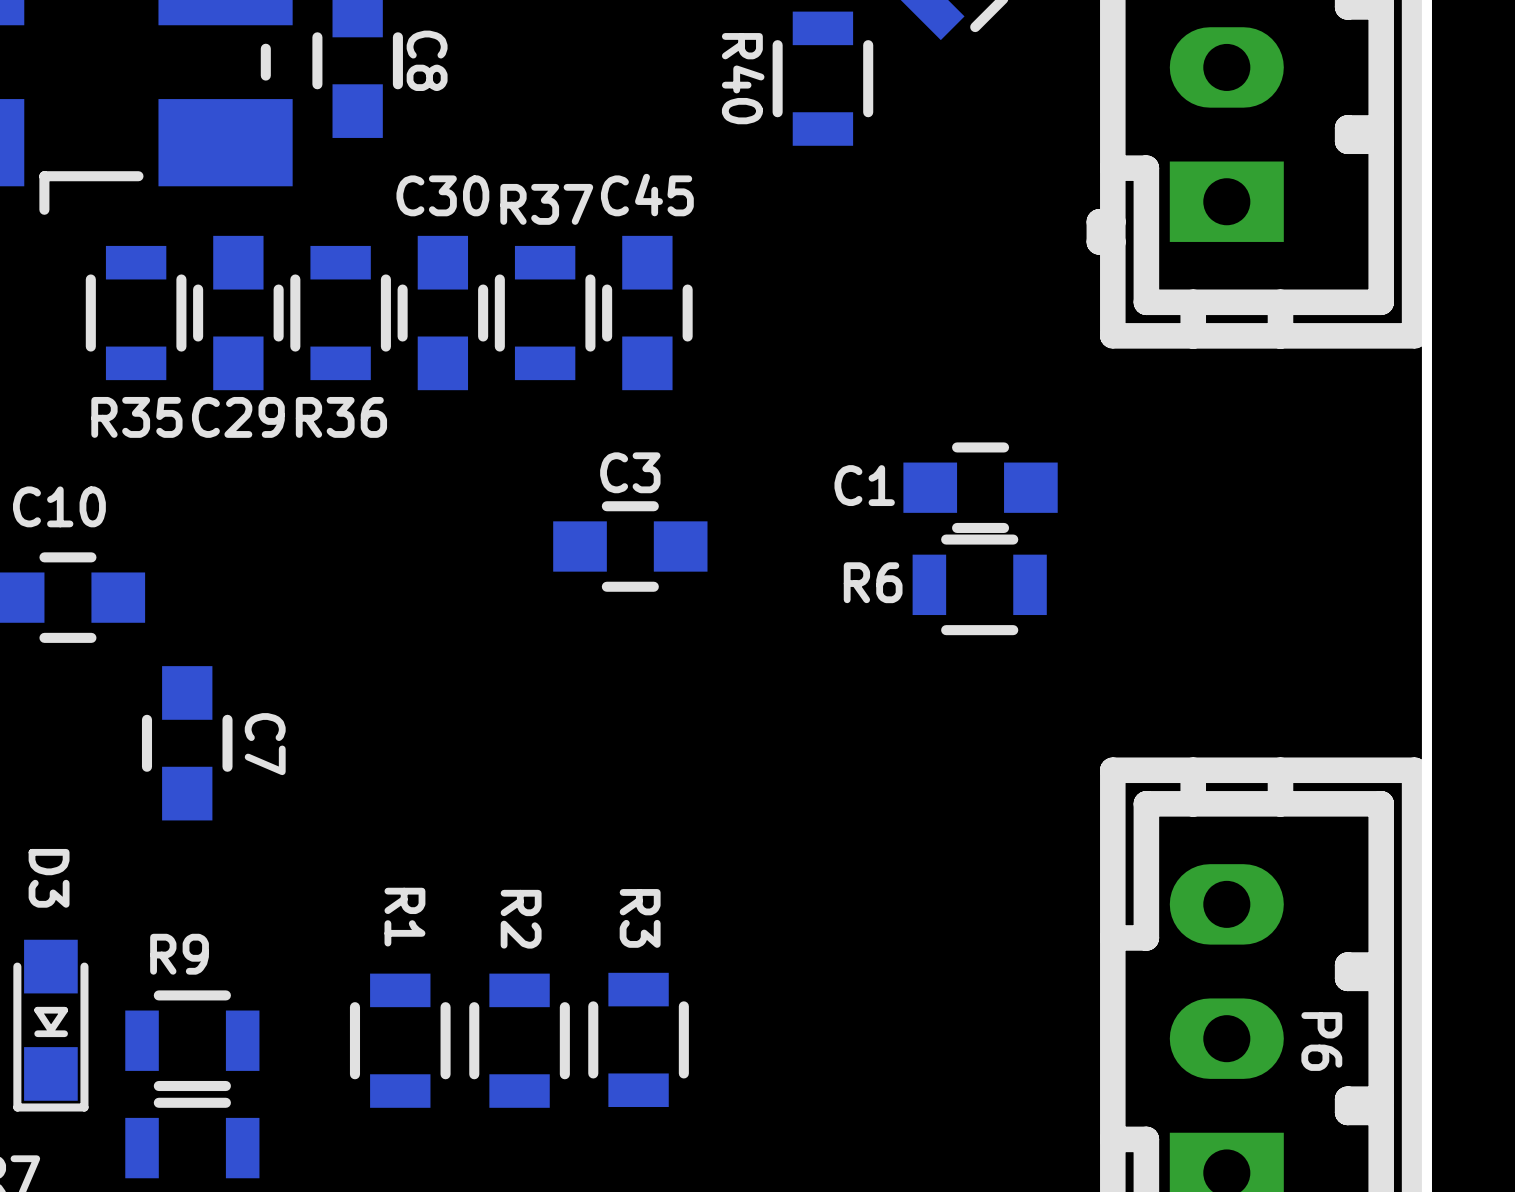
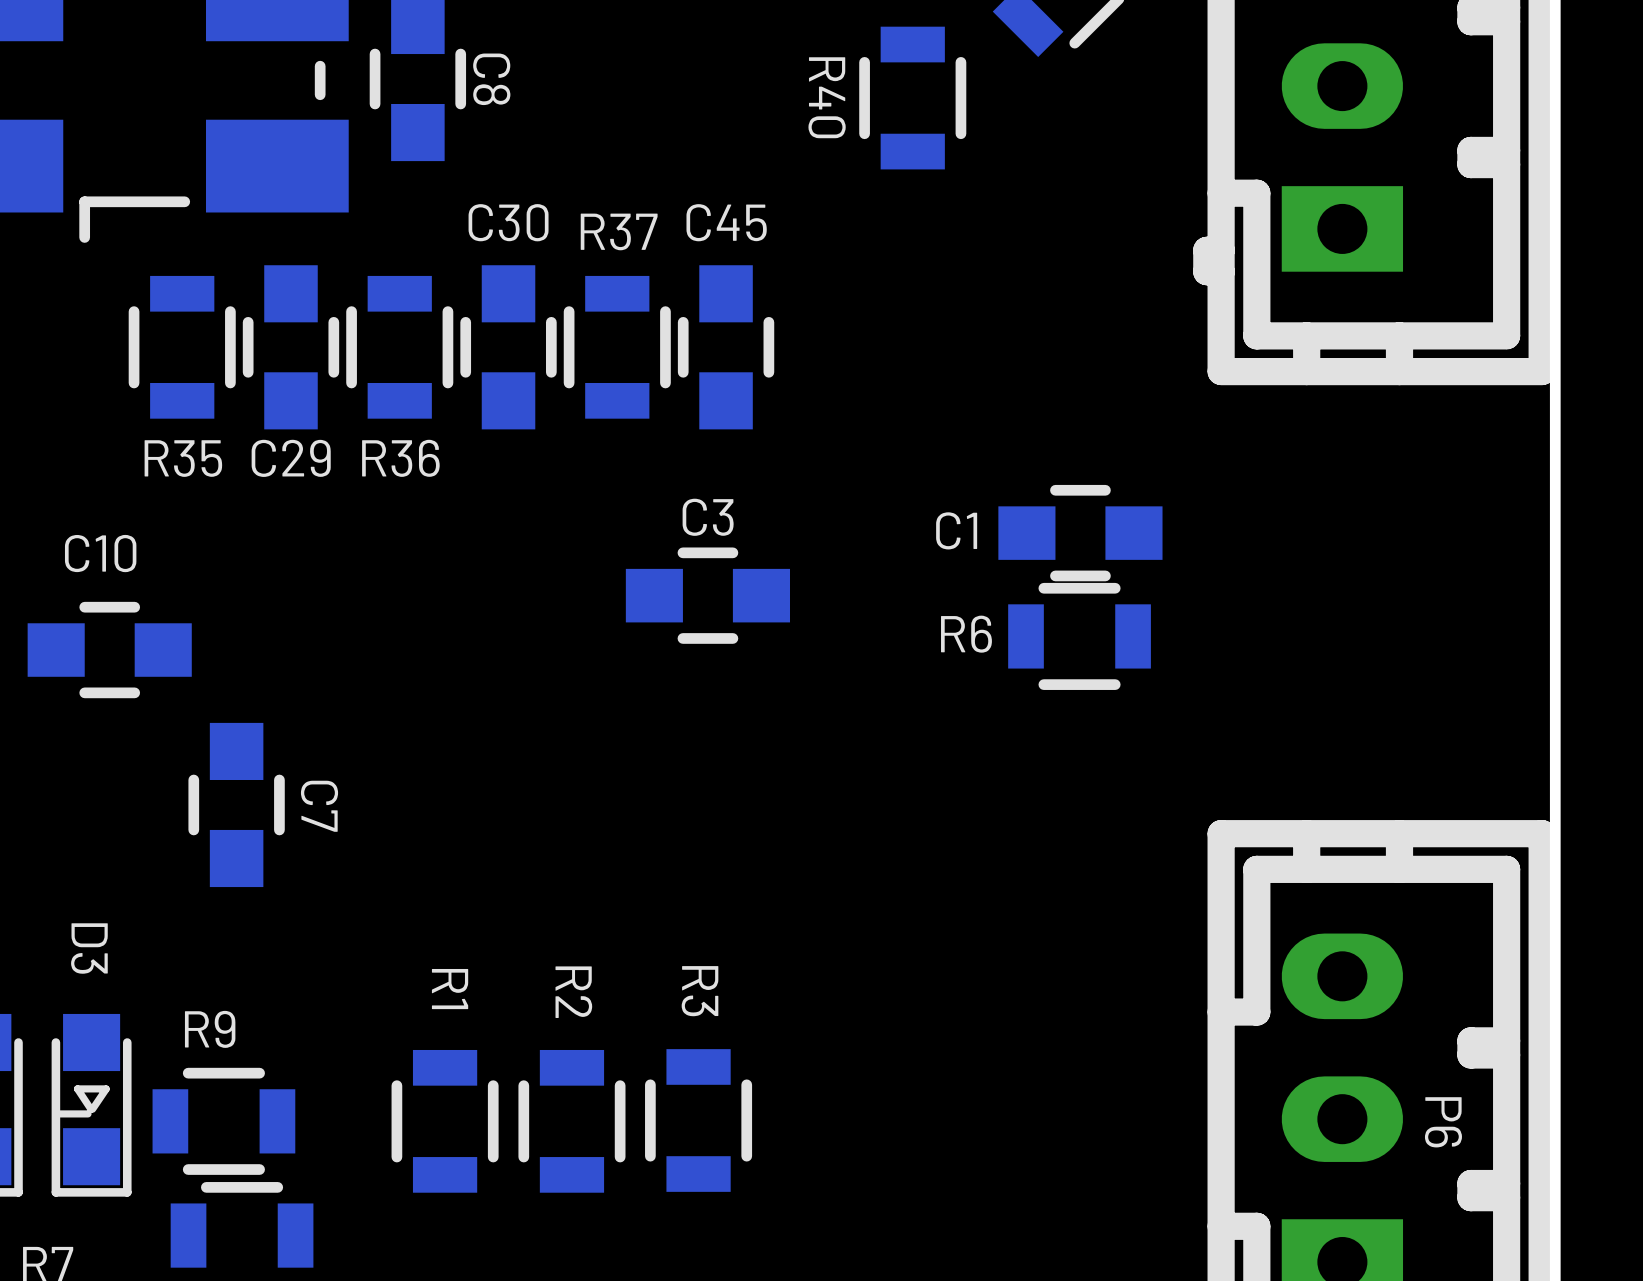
line: (64, 1033) (47, 1033) -> (77, 1113) (59, 1113)
R3 position: (638, 1039) -> (698, 1120)
R9 position: (192, 1040) -> (223, 1121)
R1 position: (400, 1040) -> (445, 1121)
R2 position: (519, 1040) -> (571, 1121)

